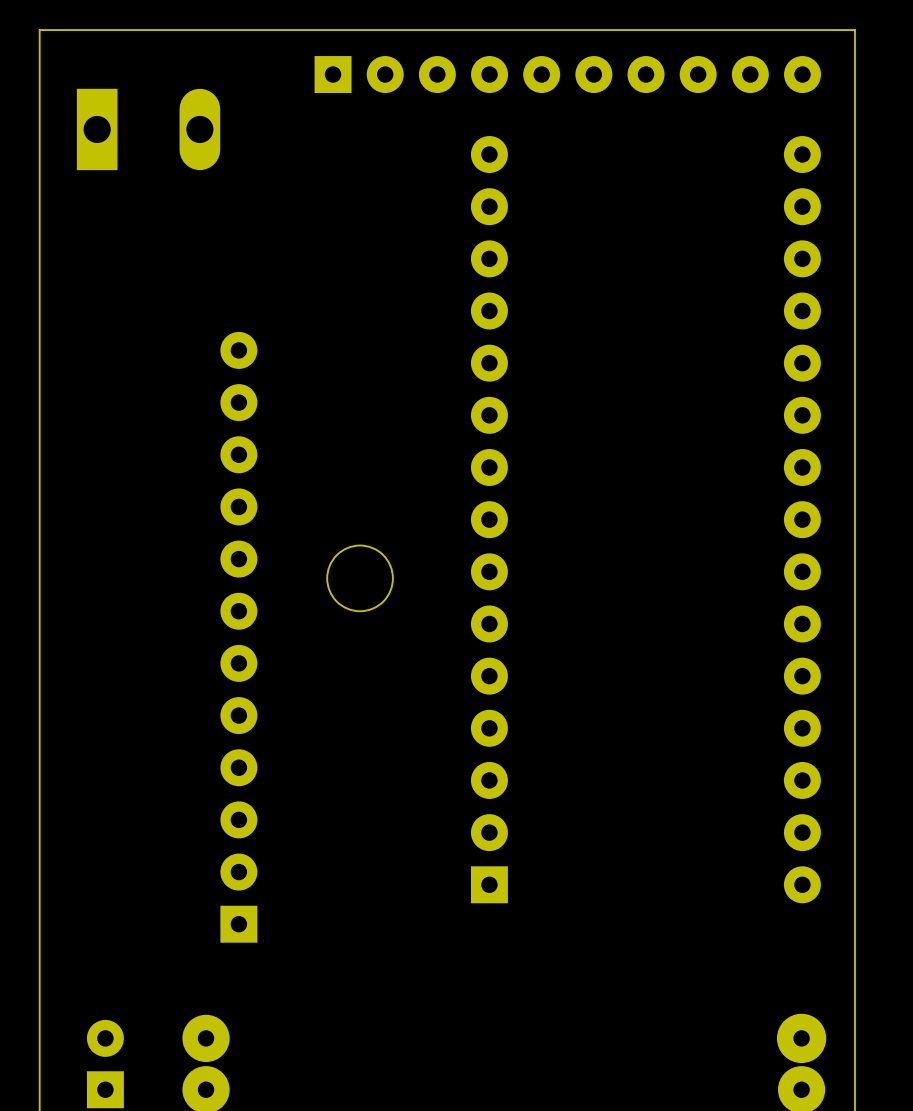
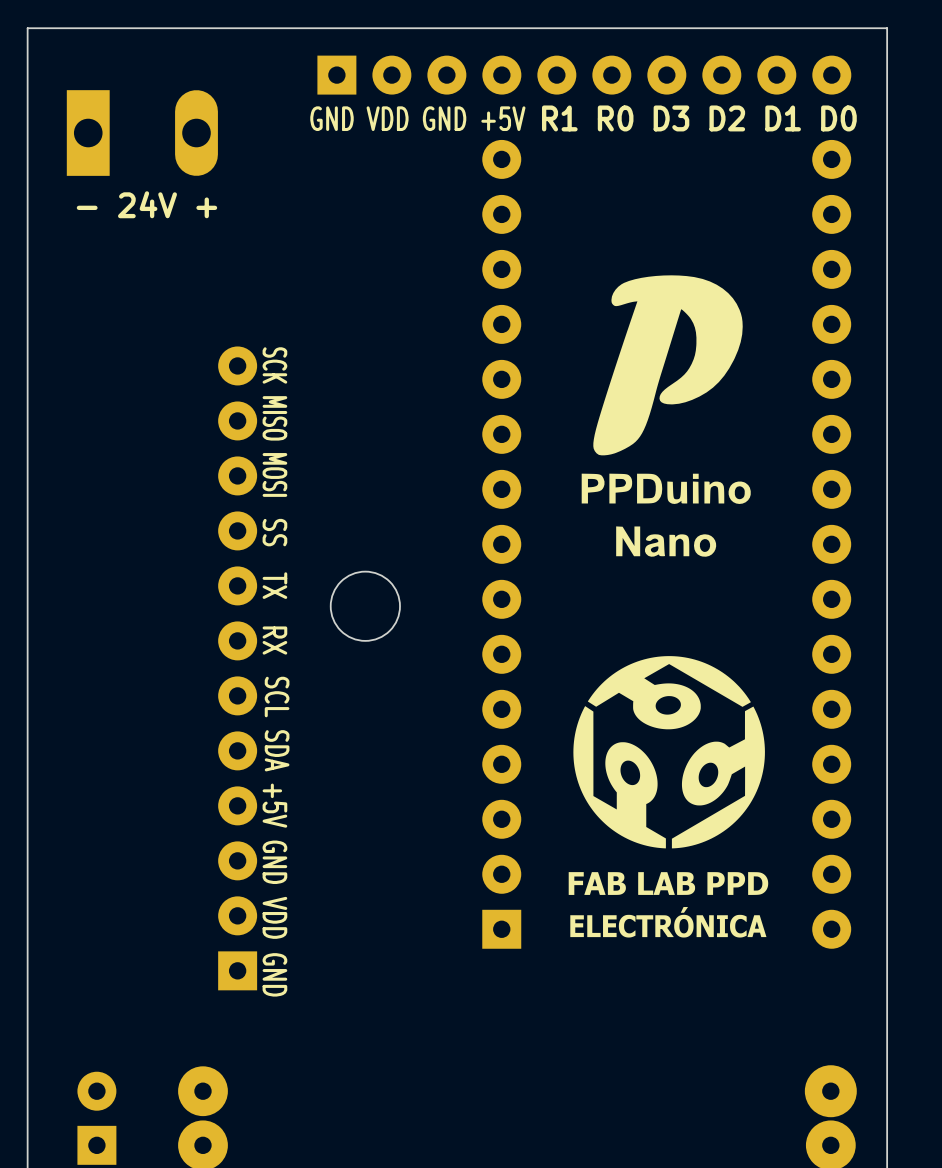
text: none -> GND VDD GND +5V (417, 118)
text: none -> R1 R0 D3 D2 D1 D0 (699, 118)
text: none -> - 24V + (146, 204)
drawing: none -> [581, 275, 751, 557]
text: none -> SCK MISO MOSI (274, 422)
text: none -> SS TX RX (274, 586)
drawing: none -> [568, 656, 769, 938]
text: none -> SCL SDA (277, 724)
text: none -> +5V GND VDD GND (274, 890)

